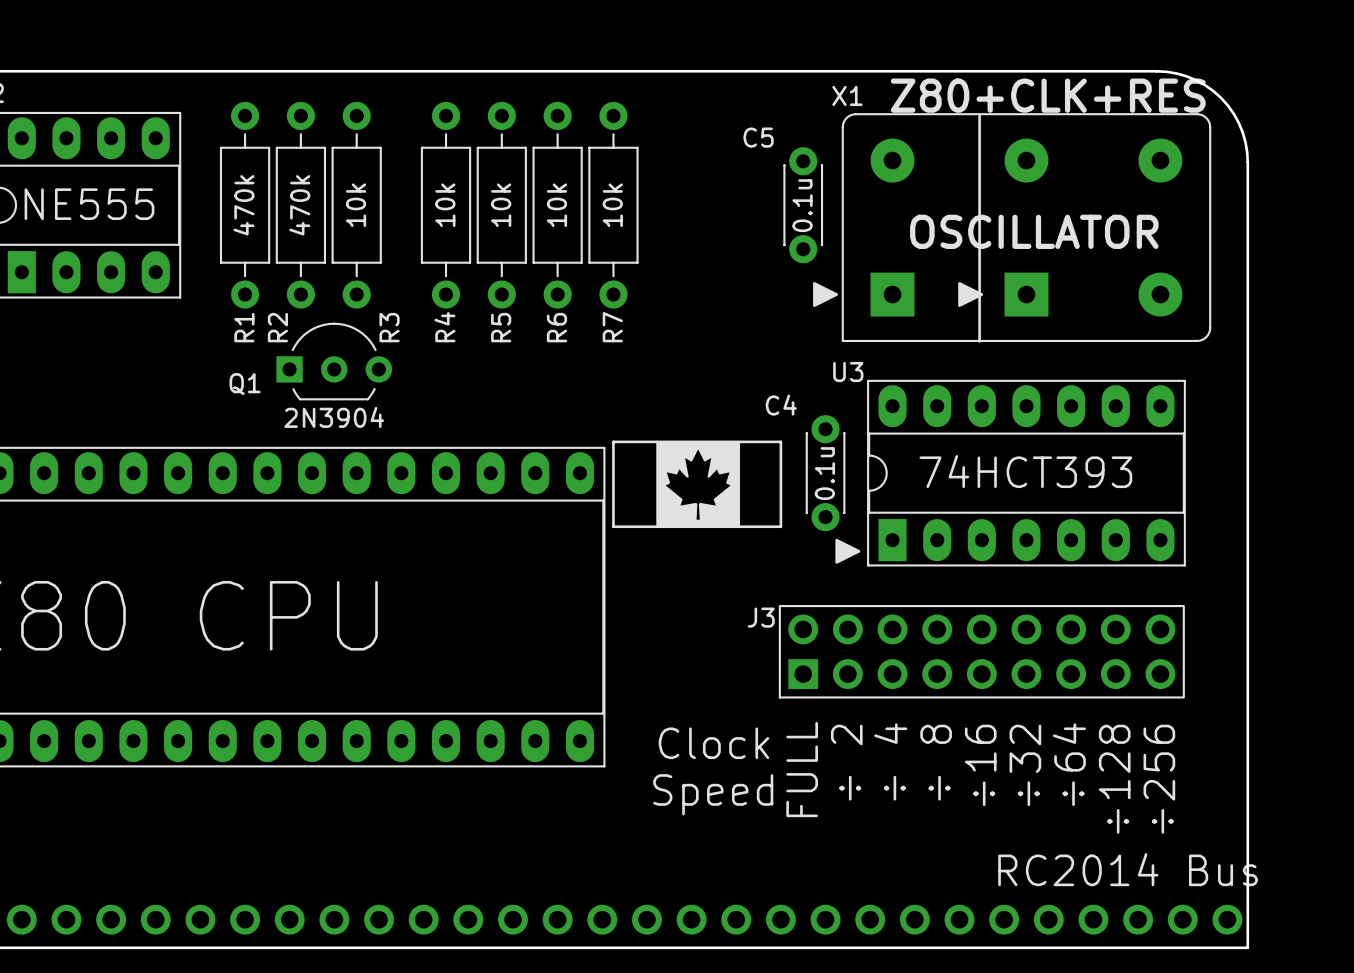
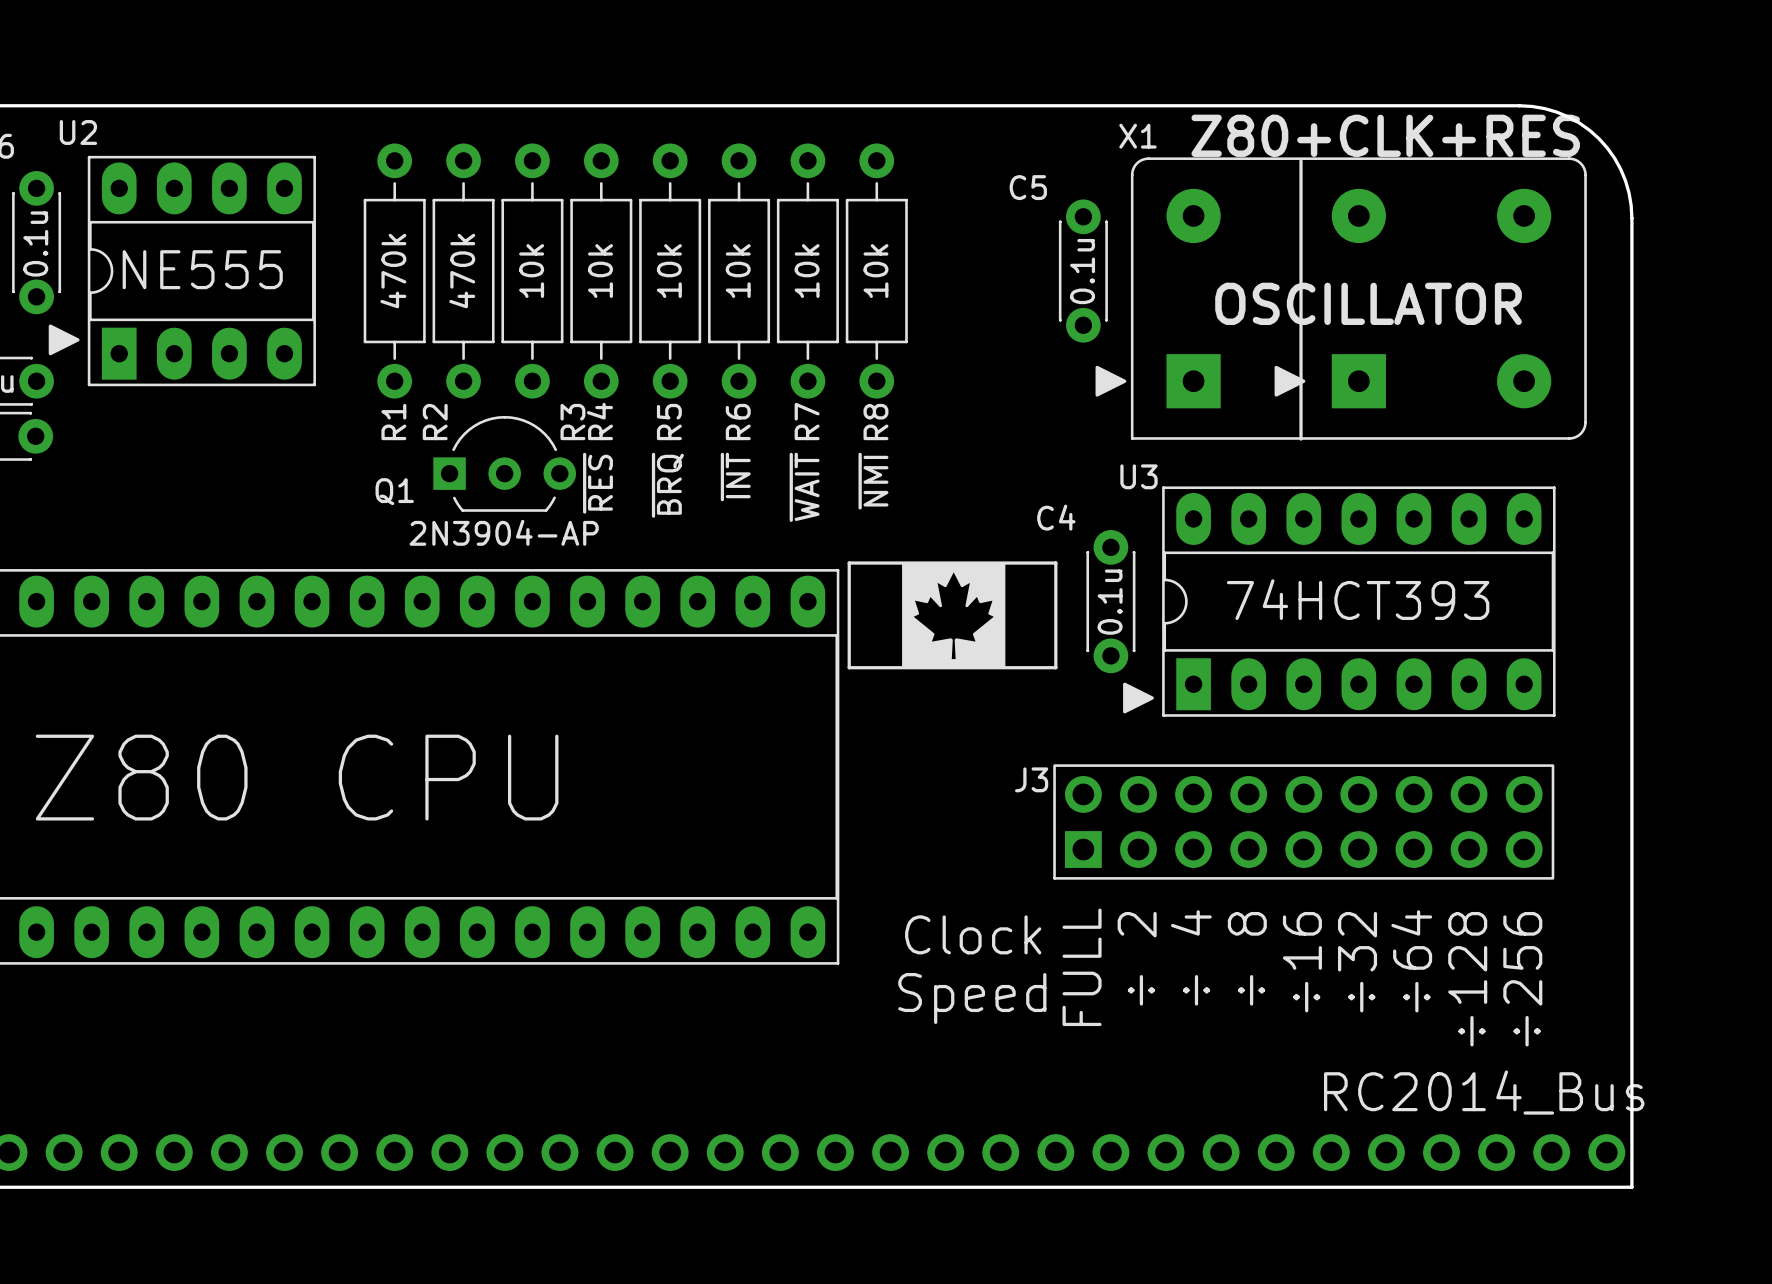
R4 position: (446, 205) -> (601, 271)
R5 position: (501, 205) -> (670, 271)
R6 position: (557, 205) -> (739, 271)
R7 position: (613, 205) -> (807, 271)
R8: none -> 10k (876, 271)
text: none -> ~{INT} (735, 476)
text: none -> ~{NMI} (873, 481)
text: none -> ~{RES} (598, 483)
text: none -> ~{BRQ} (667, 485)
text: none -> ~{WAIT} (804, 487)
Q1 value: 2N3904 (334, 417) -> 2N3904-AP (504, 532)
part value: RC2014 Bus (1128, 869) -> RC2014_Bus (1484, 1092)

